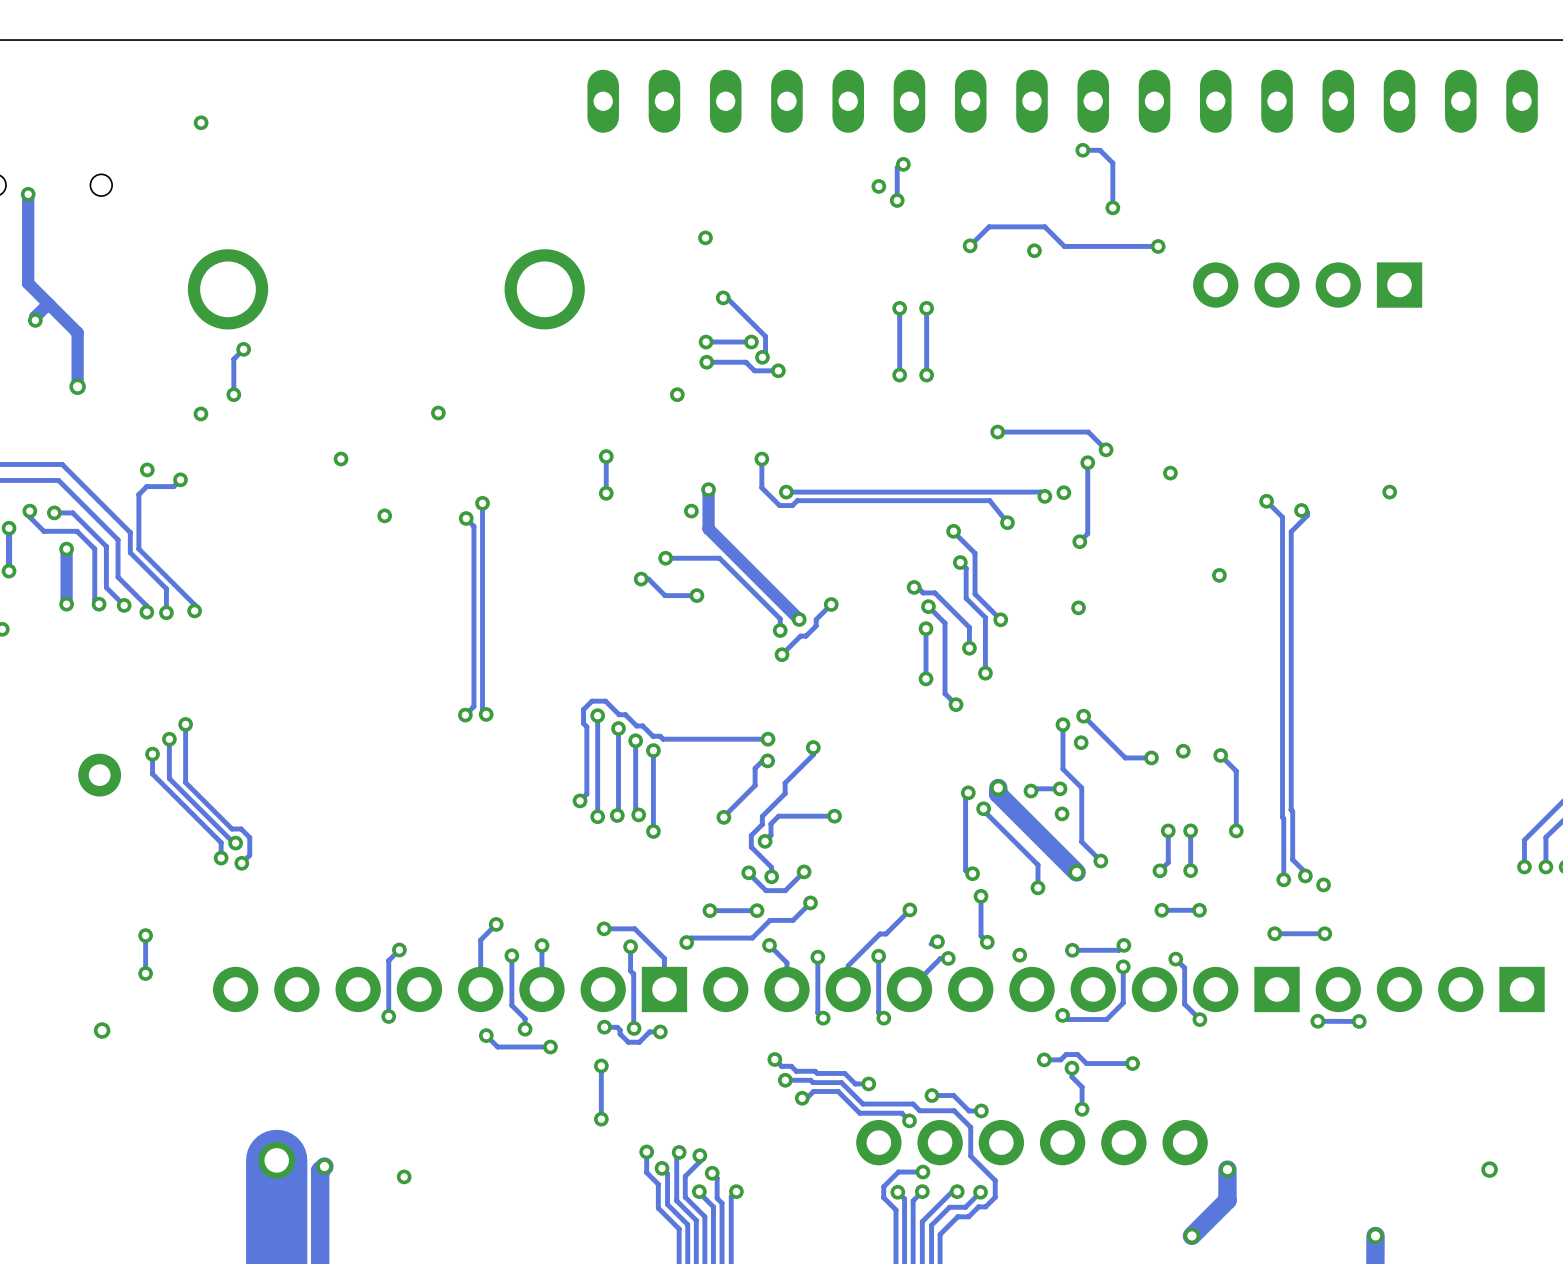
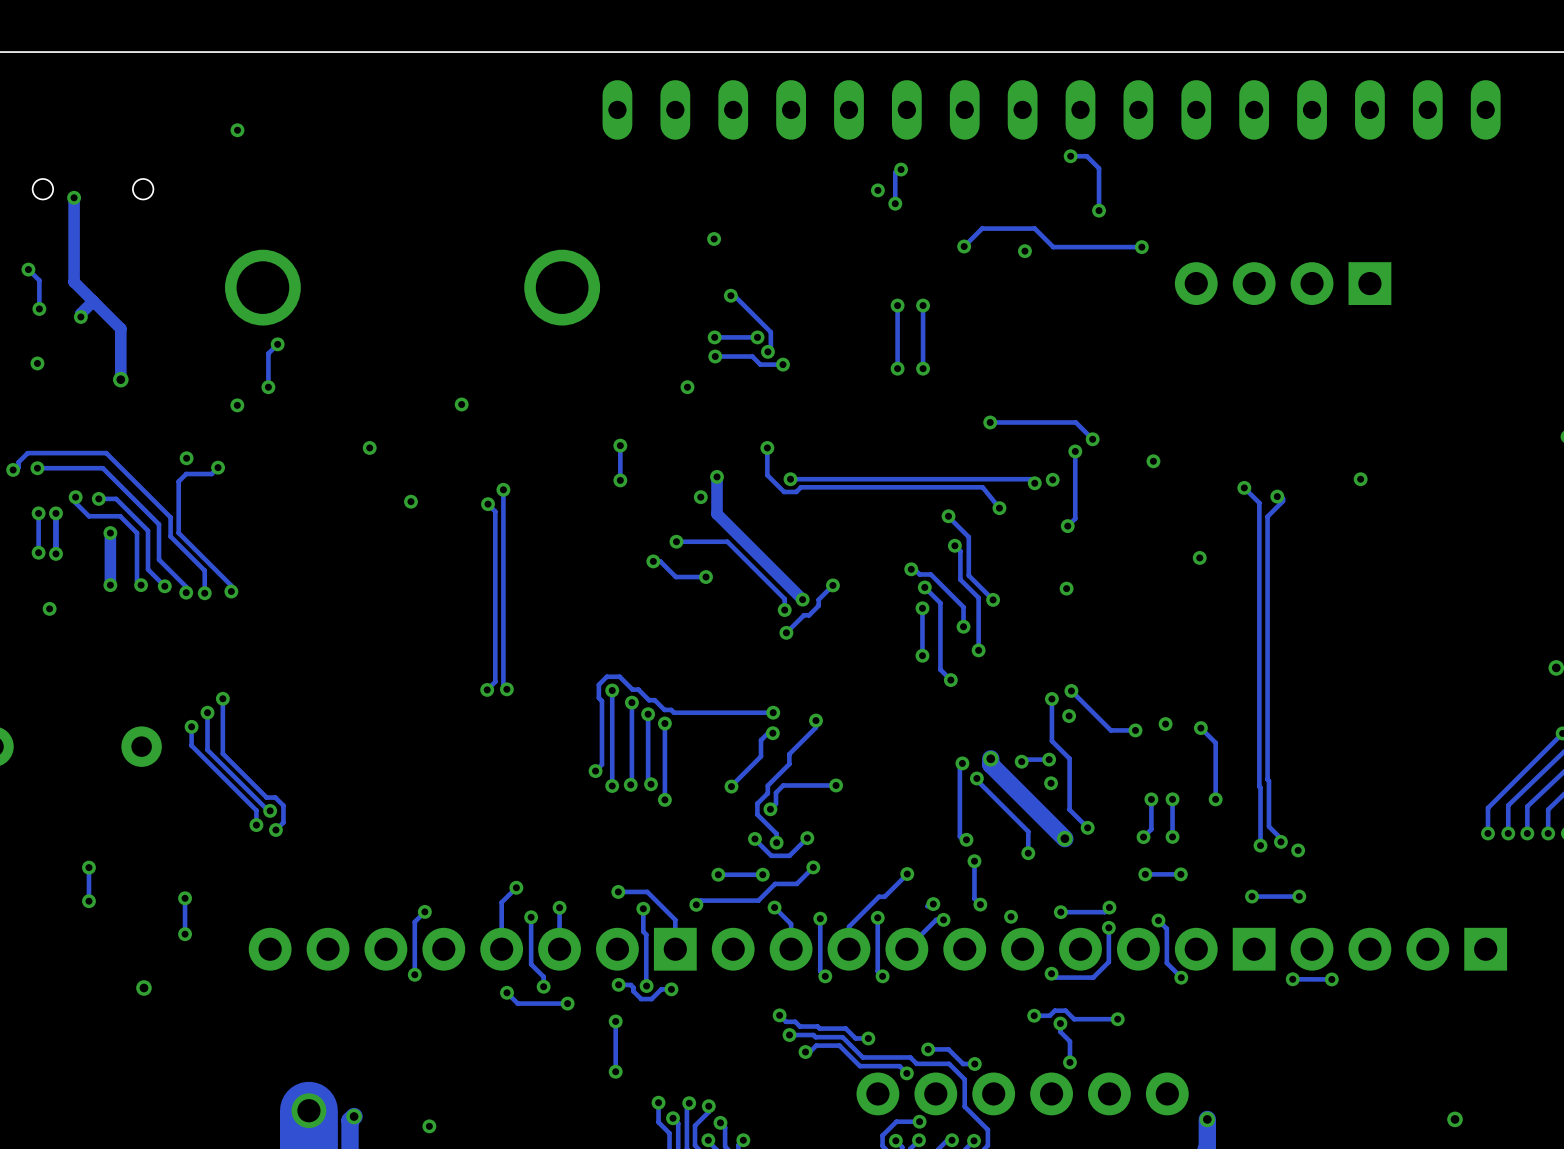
track: none -> (88, 867) (88, 901)
via: none -> (88, 867)
via: none -> (88, 901)

